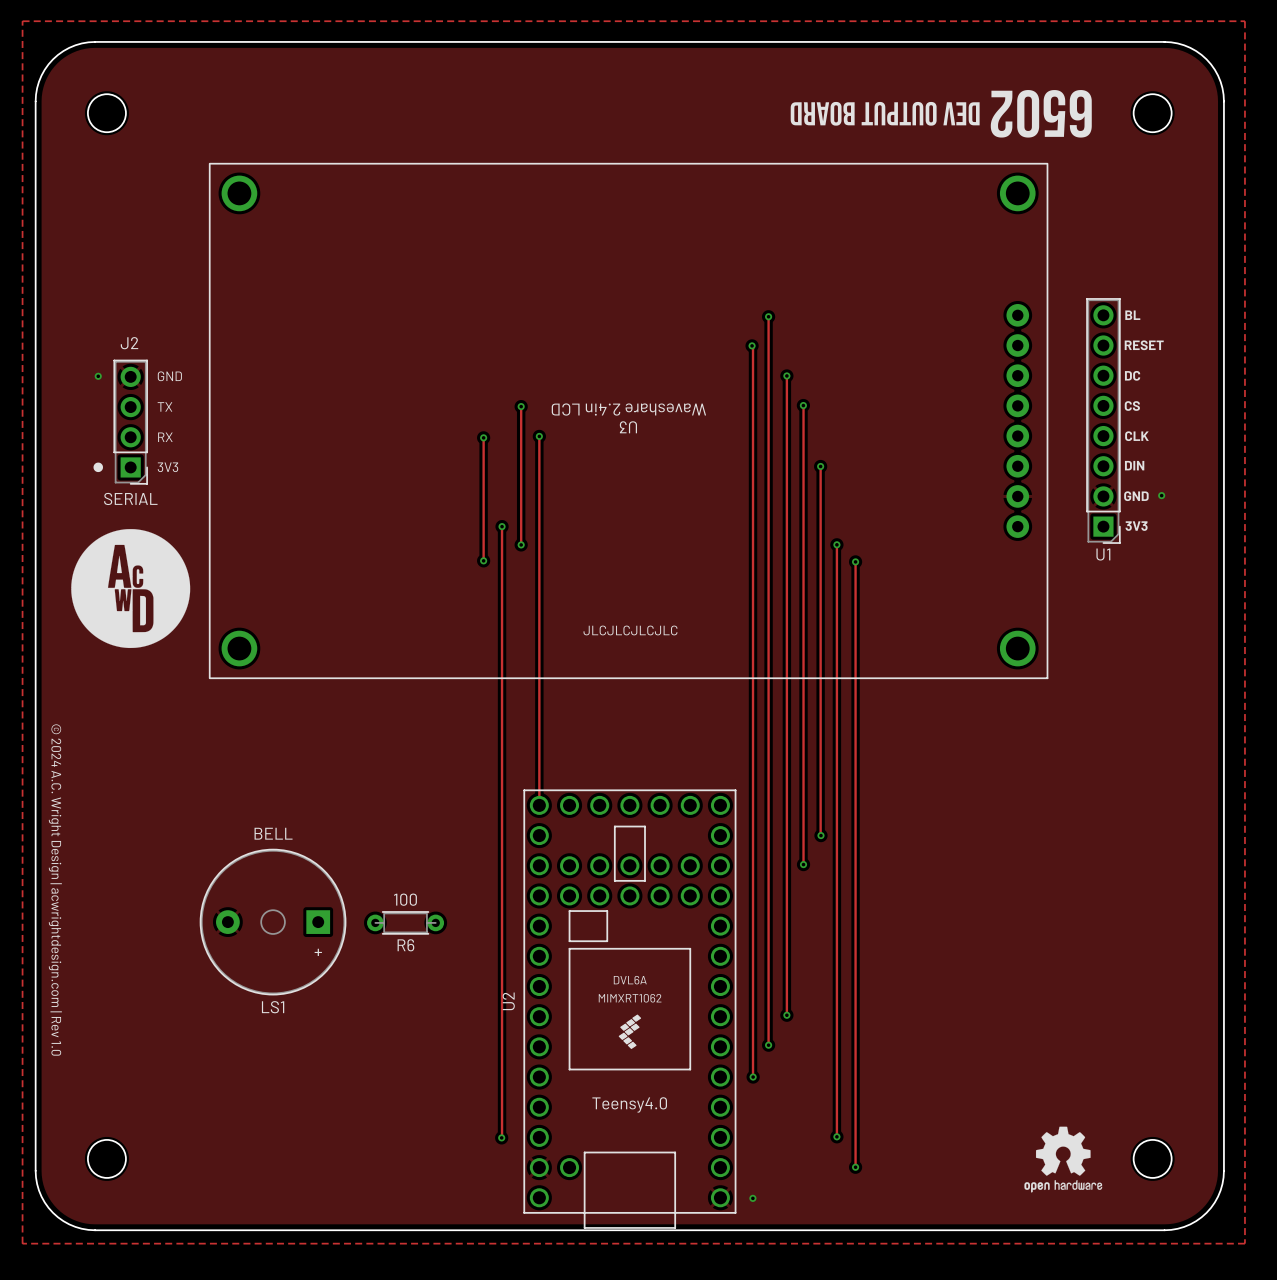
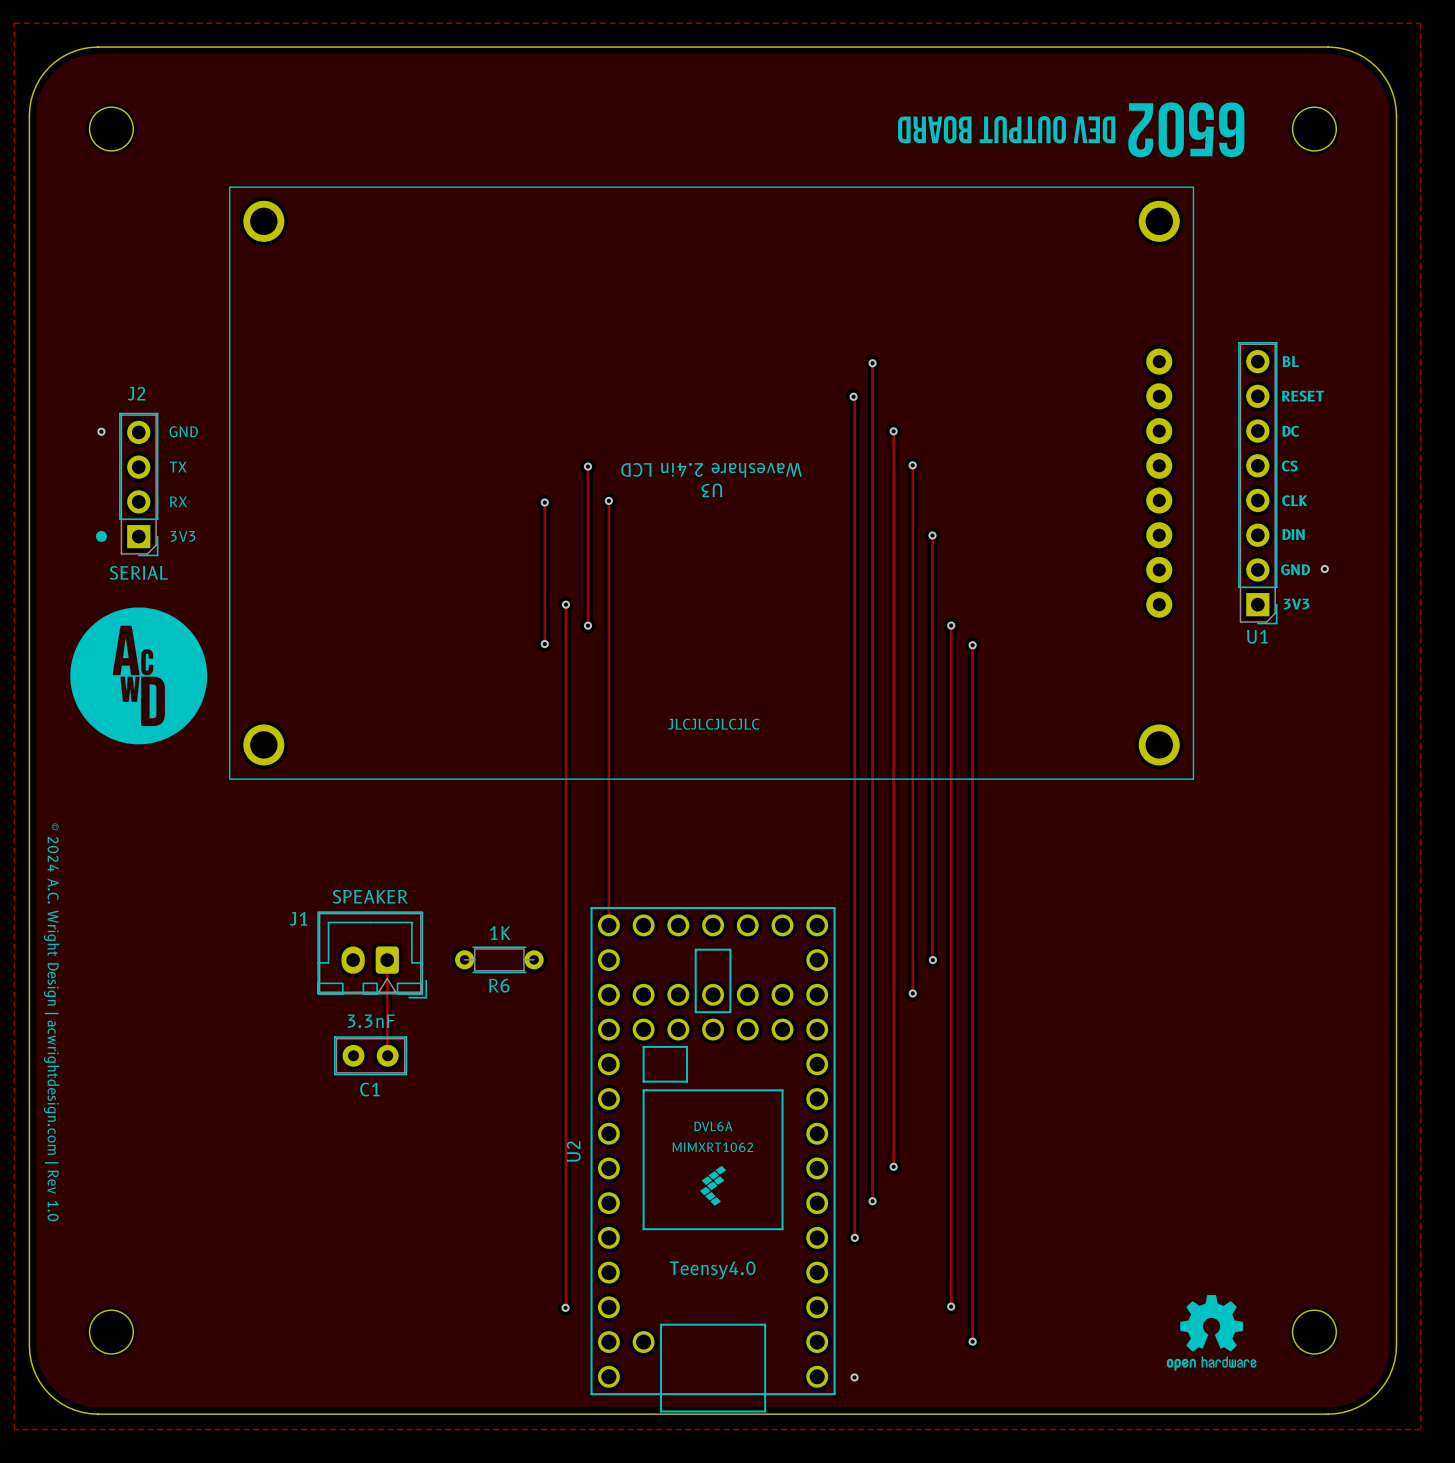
J1: none -> SPEAKER (372, 954)
track: none -> (387, 960) (387, 1055)
R6 value: 100 (405, 899) -> 1K (500, 933)
C1: none -> 3.3nF (370, 1055)
LS1: BELL (273, 922) -> none
R6 position: (405, 922) -> (499, 959)

